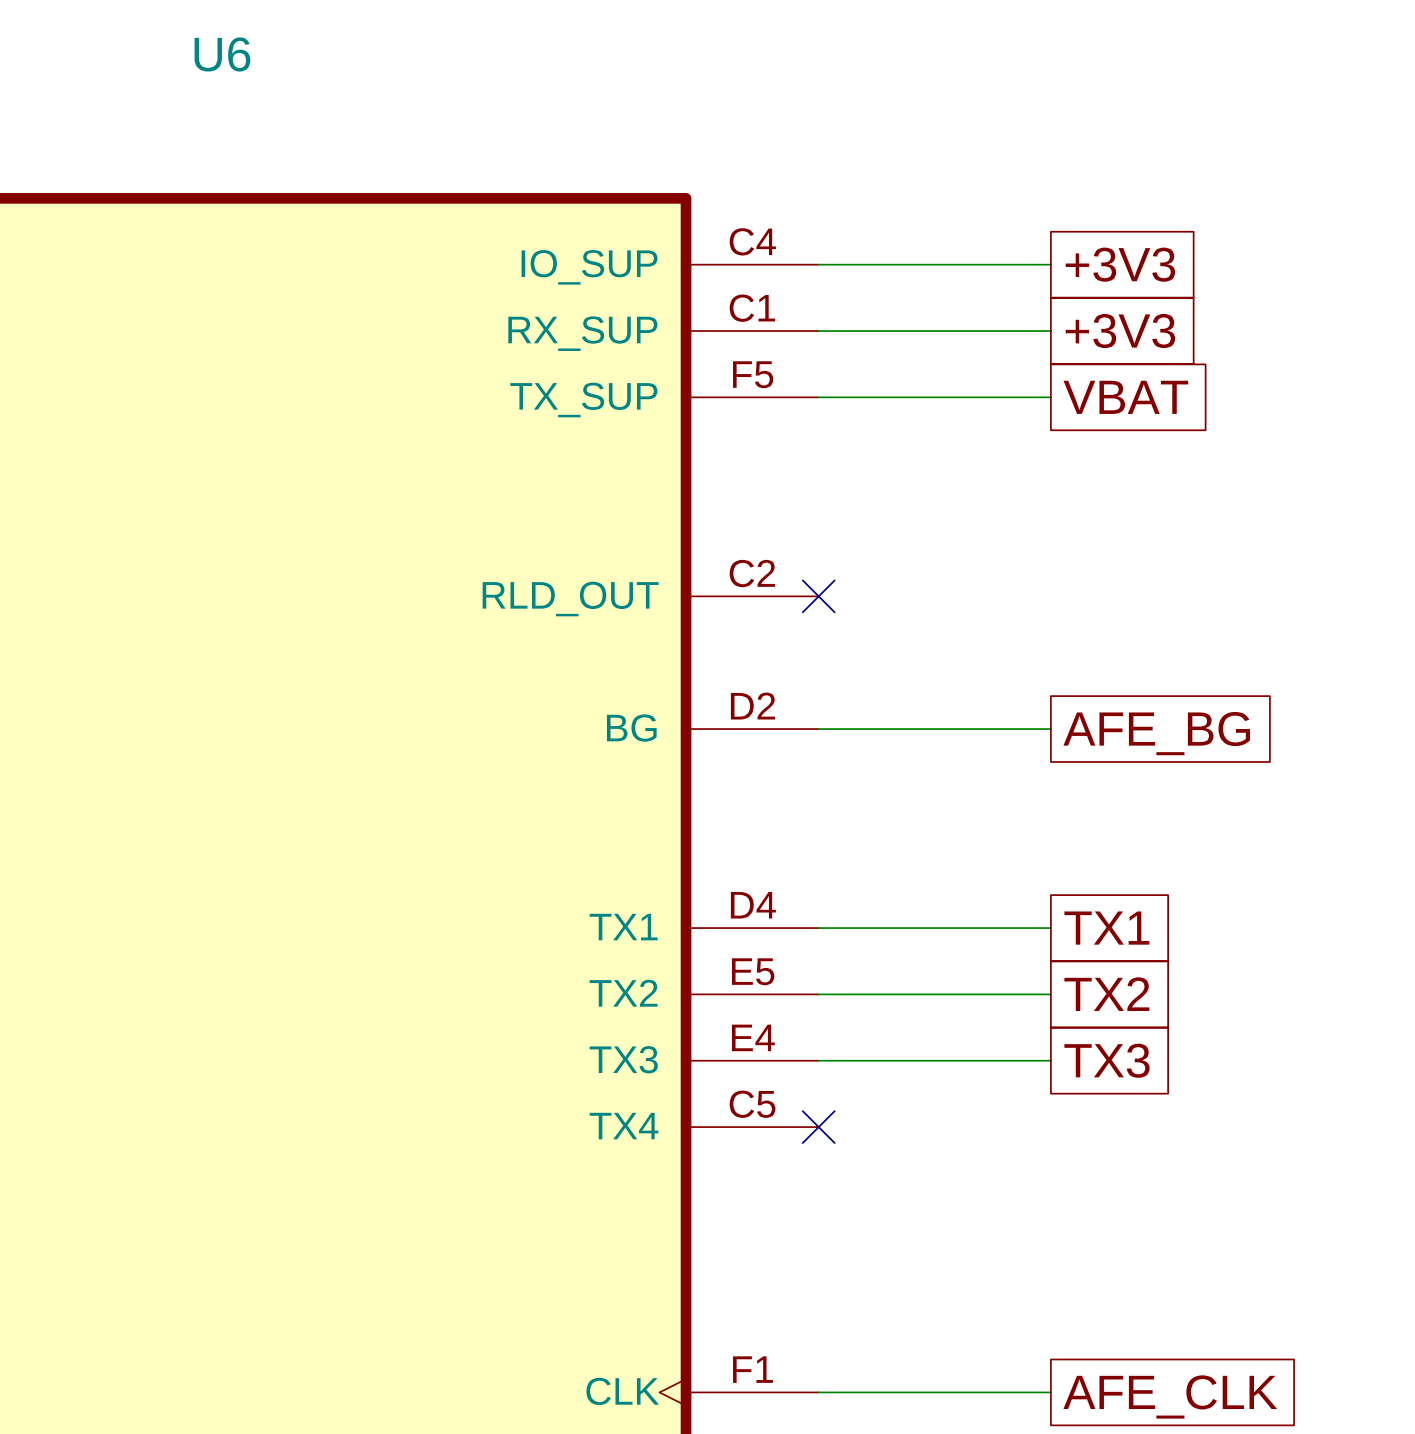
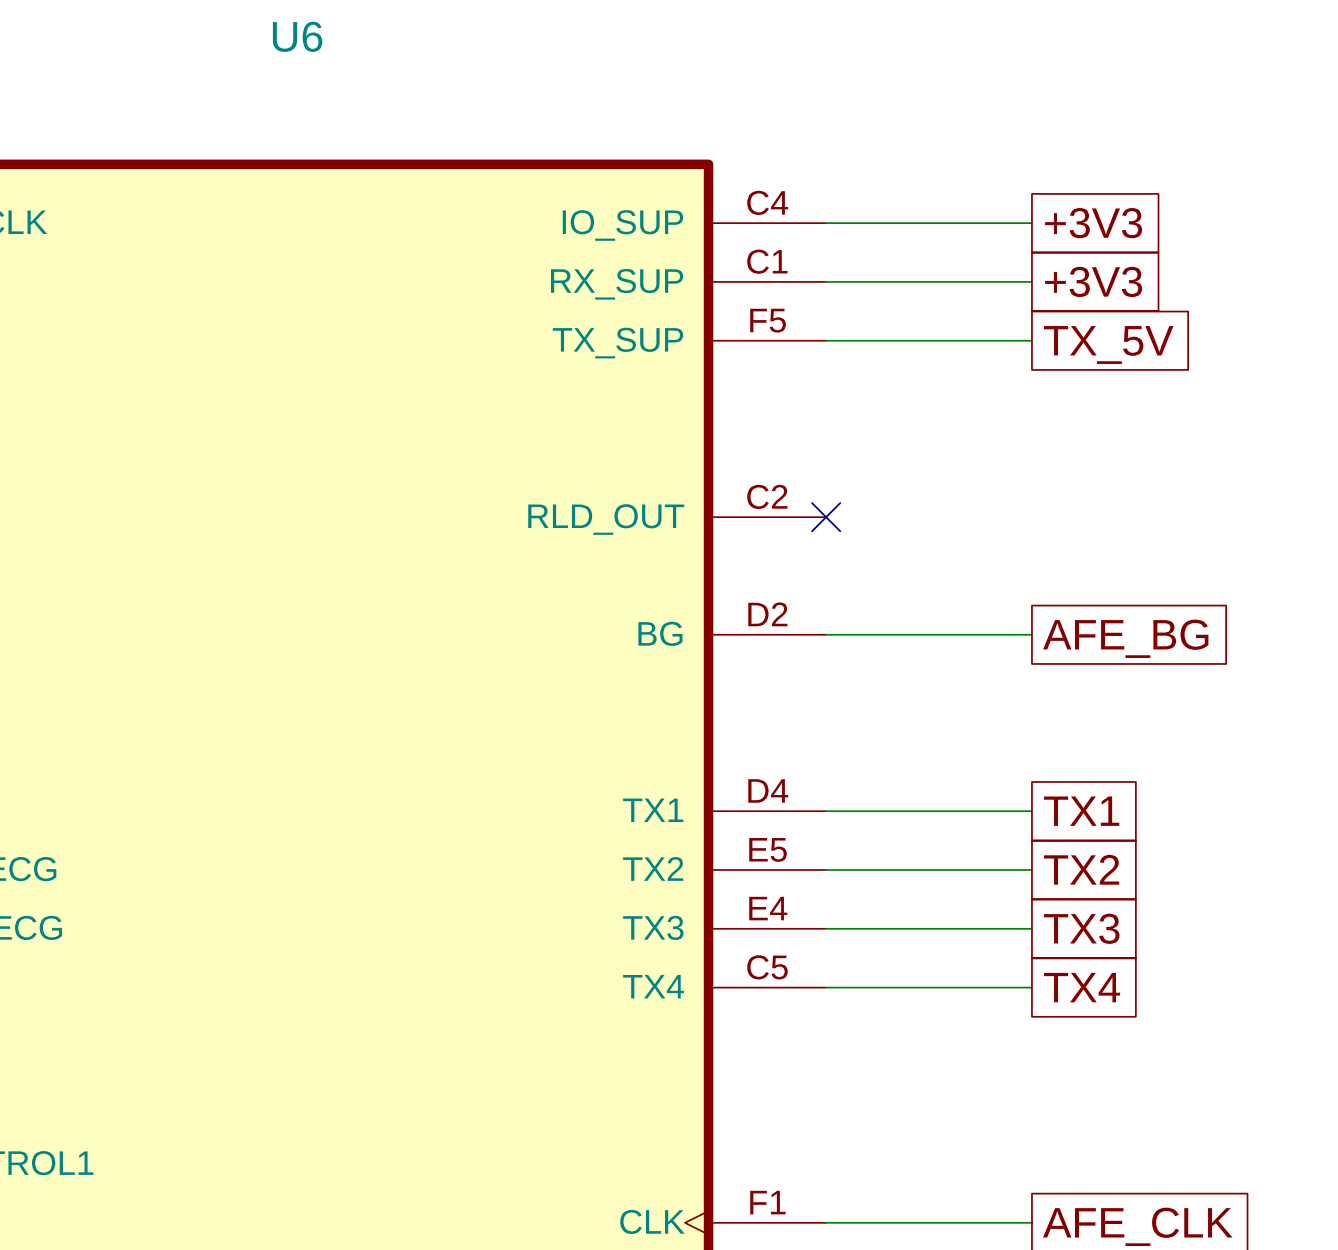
global label: VBAT (1125, 397) -> TX_5V (1108, 344)
wire: none -> (826, 987) (1031, 987)
no-connect mark: (818, 1127) -> none
global label: none -> TX4 (1082, 987)

